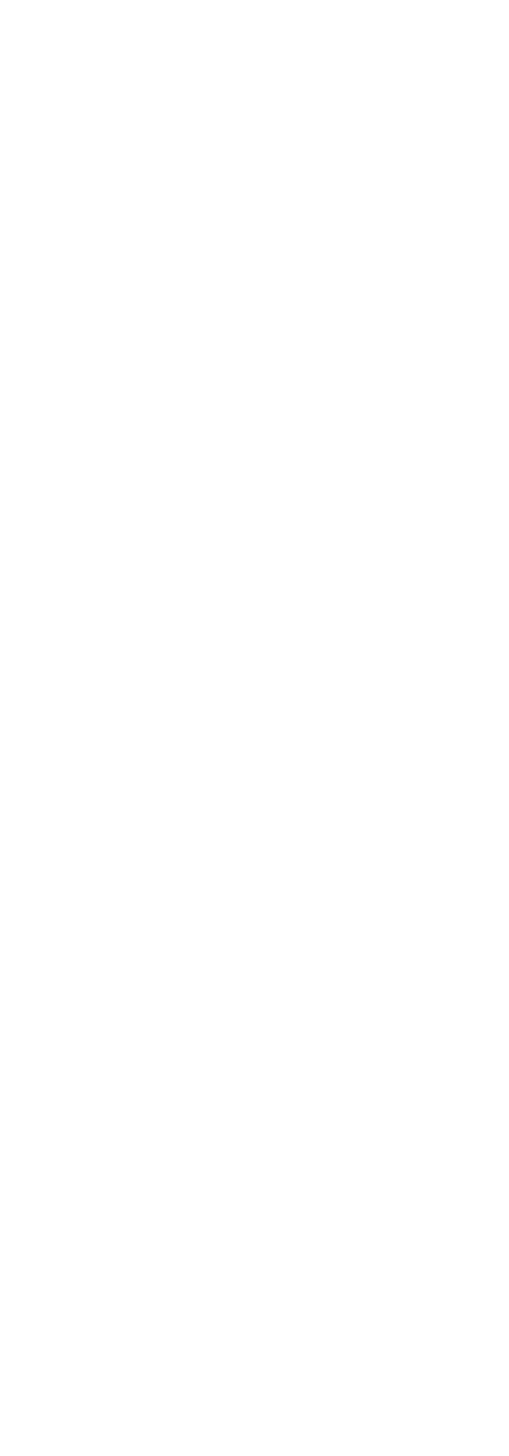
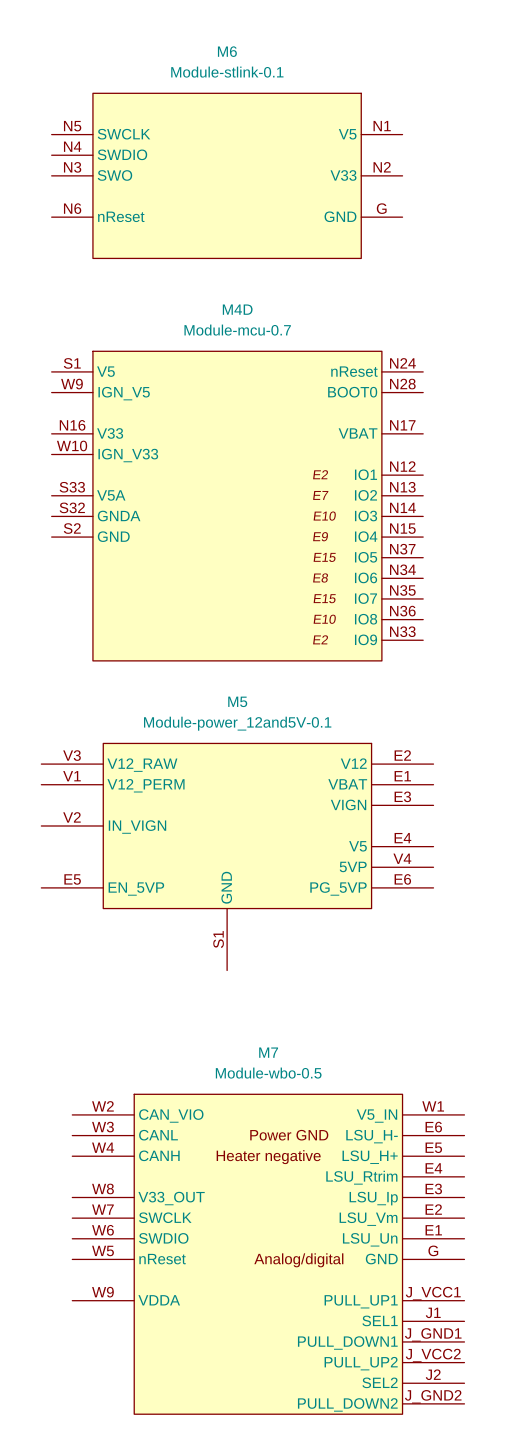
M6: none -> Module-stlink-0.1 (227, 175)
M4D: none -> Module-mcu-0.7 (237, 506)
M5: none -> Module-power_12and5V-0.1 (237, 856)
M7: none -> Module-wbo-0.5 (268, 1254)

